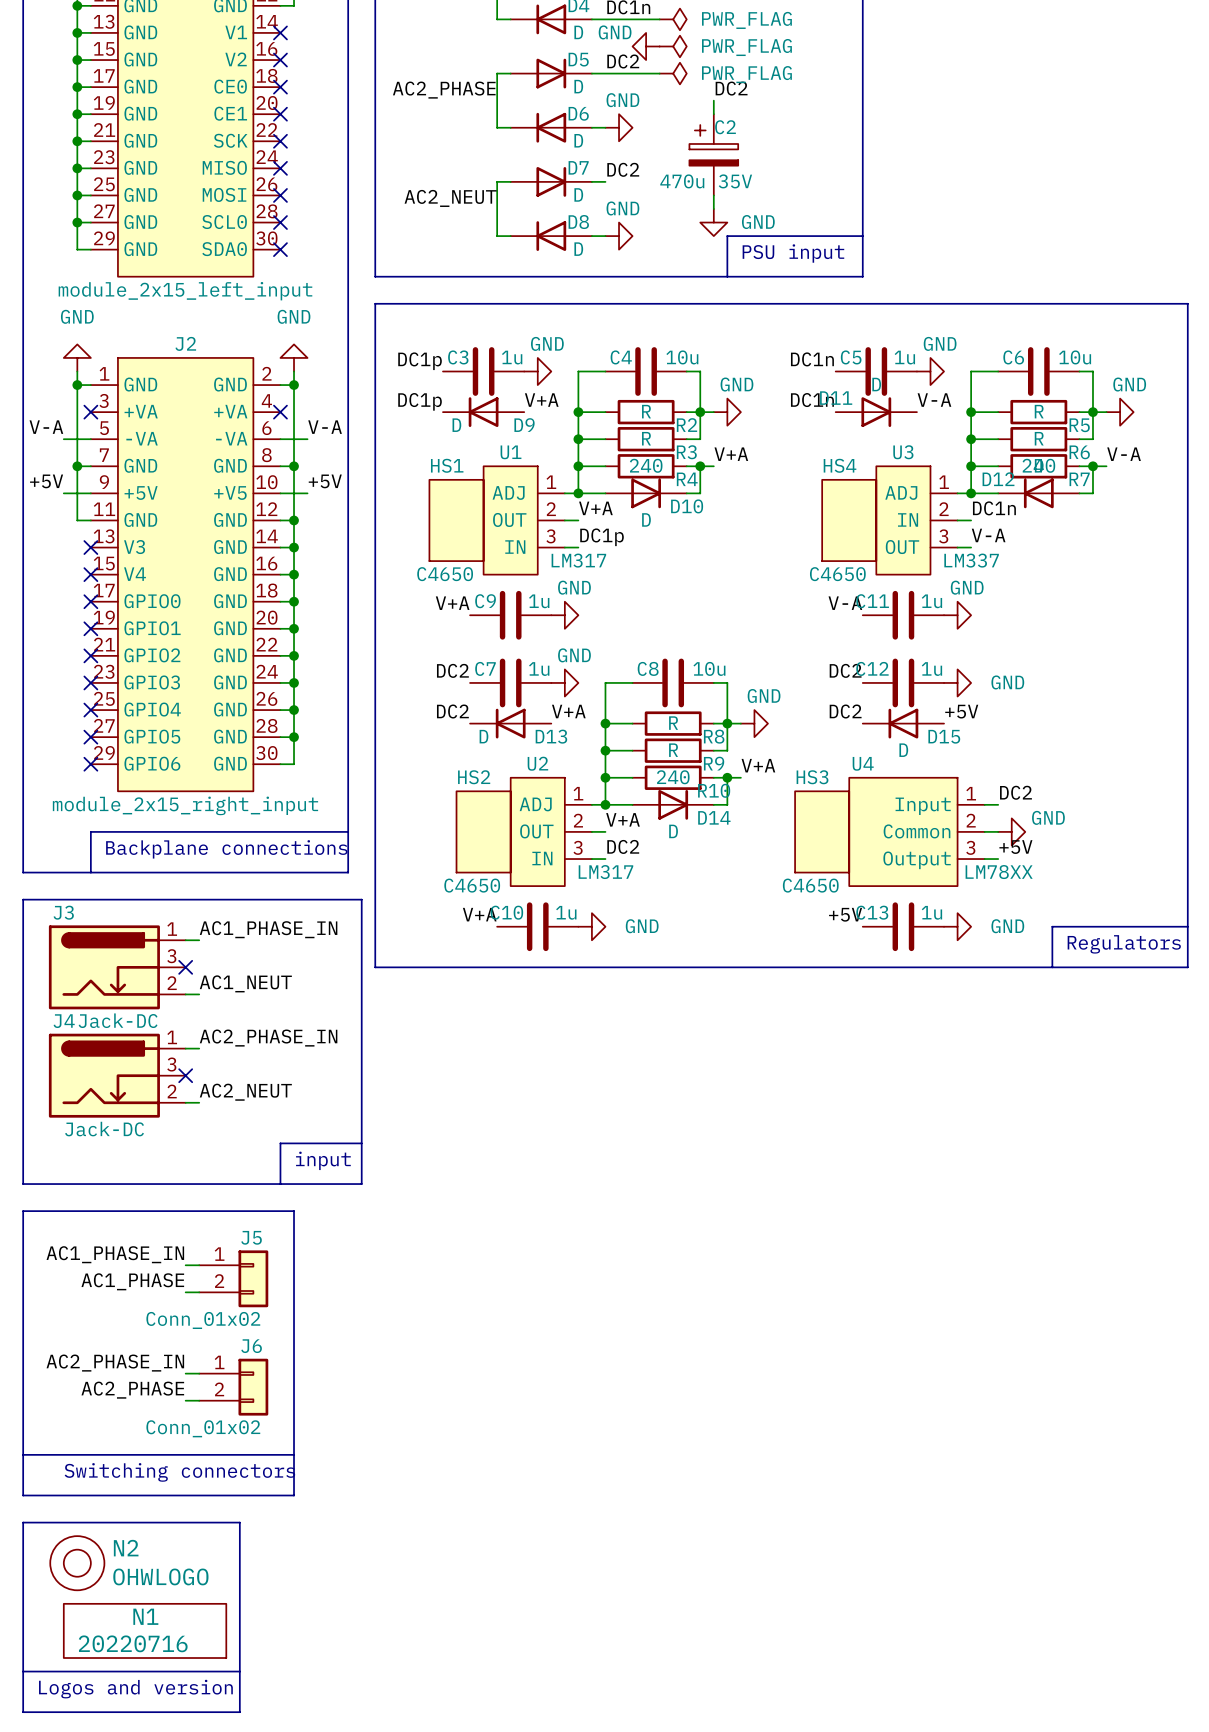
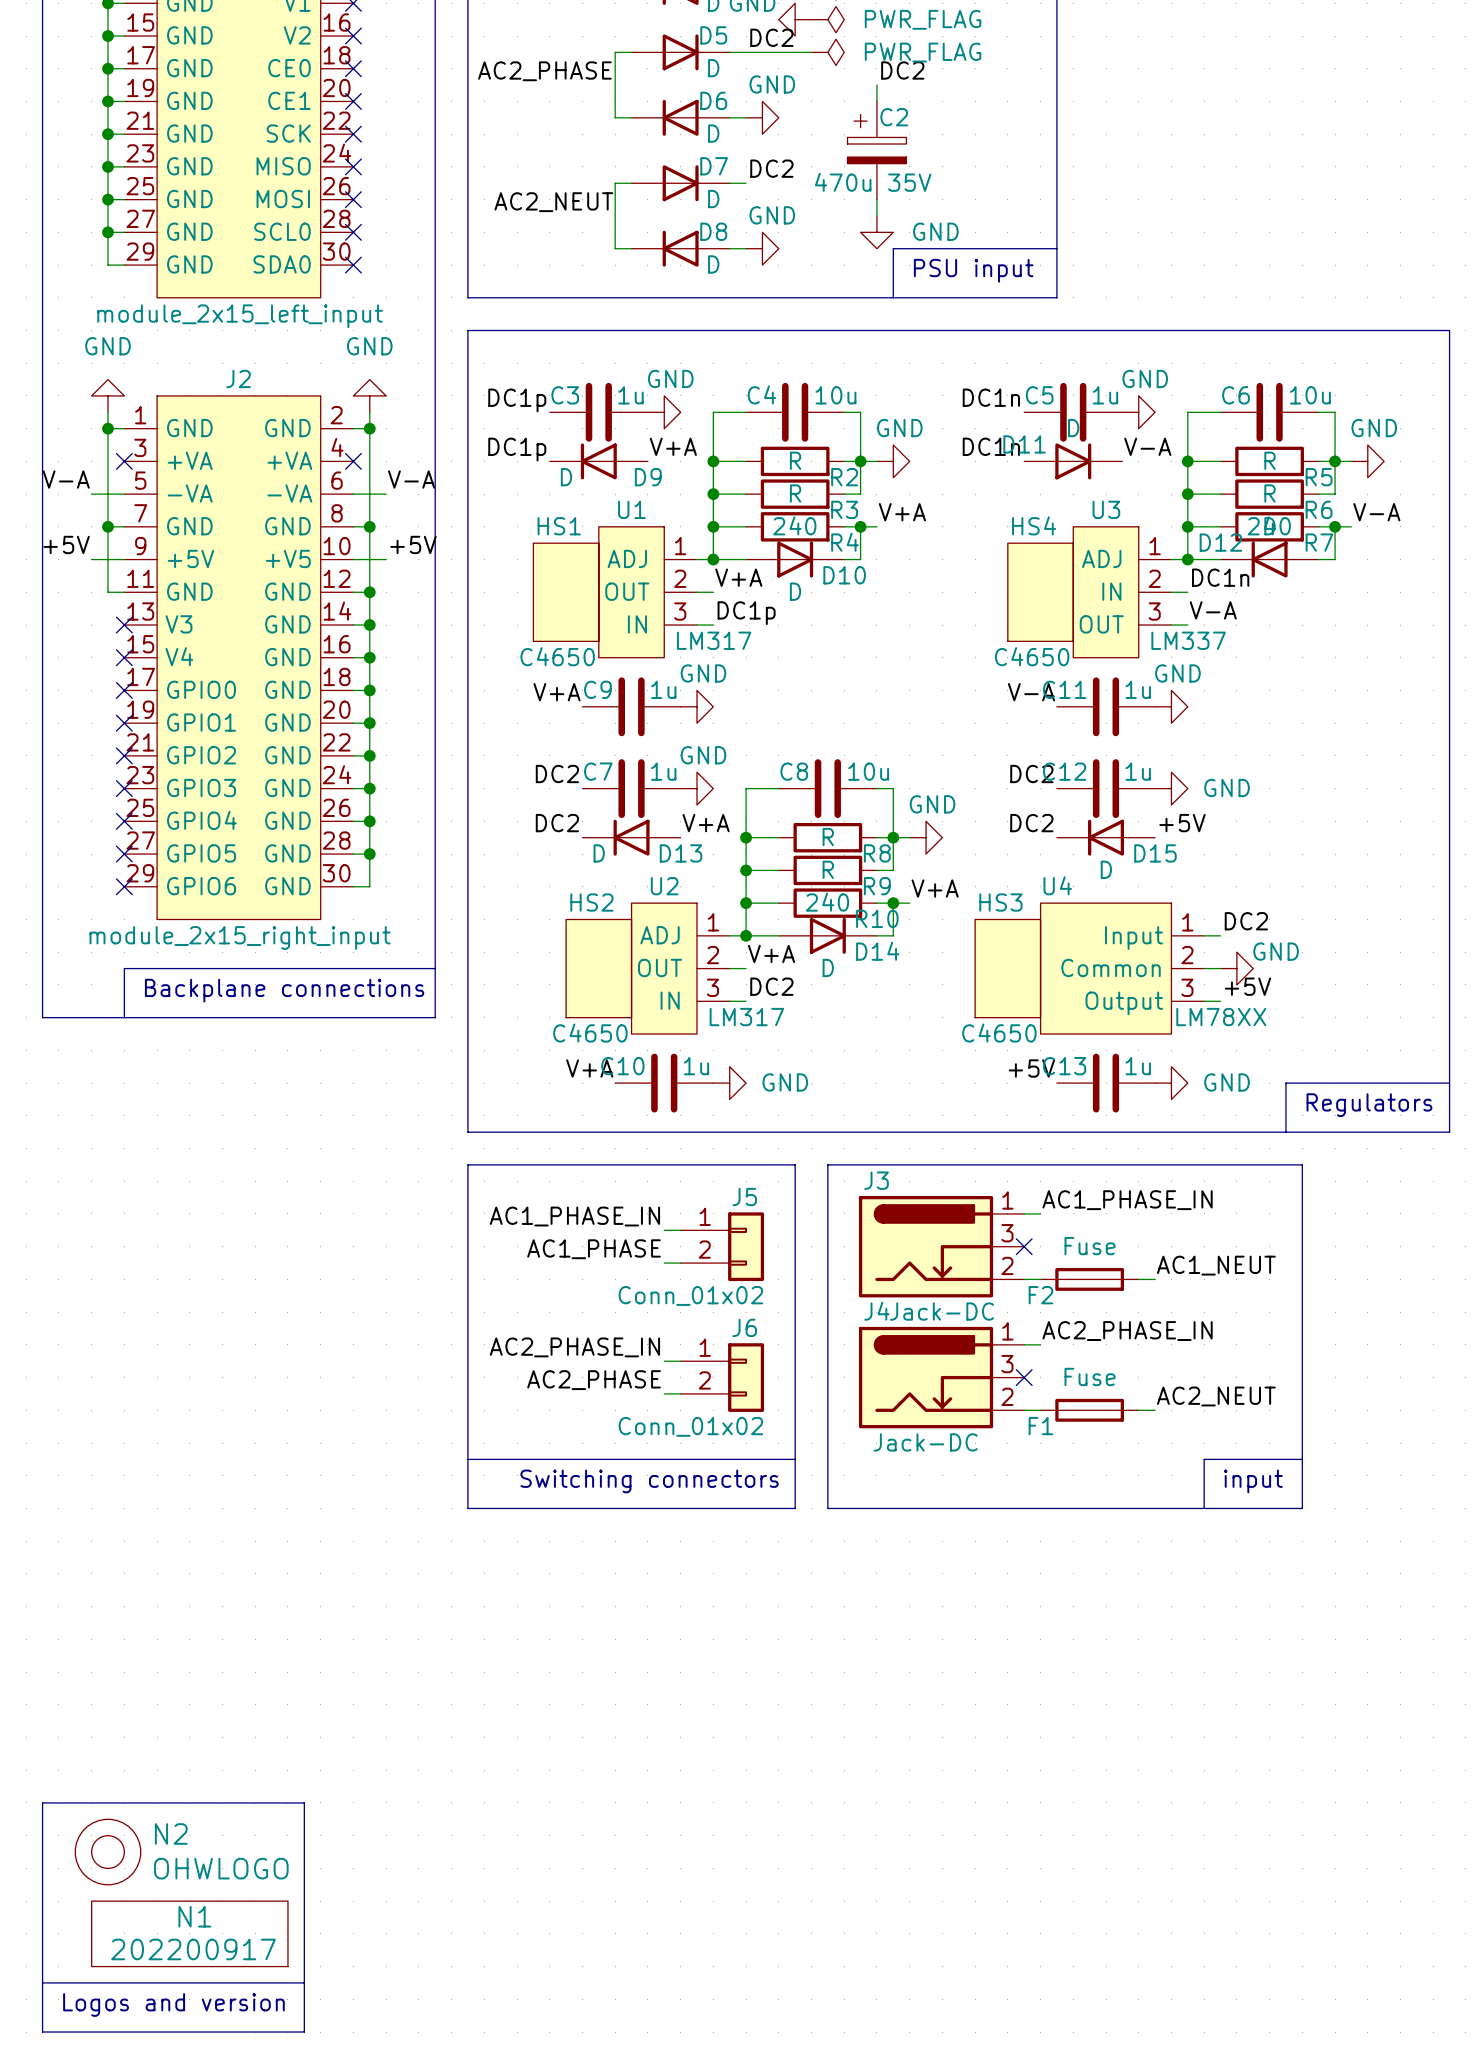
line: (23, 899) (23, 1184) (361, 1184) (361, 899) (23, 899) -> none
label: AC1_PHASE_IN (268, 929) -> none
wire: (185, 940) (199, 940) -> none
J3 position: (117, 967) -> (941, 1246)
no-connect mark: (185, 967) -> none
label: AC1_NEUT (245, 983) -> none
wire: (185, 994) (199, 994) -> none
line: none -> (467, 1164) (795, 1164) (795, 1508) (467, 1508) (467, 1164)
line: none -> (827, 1164) (827, 1508) (1302, 1508) (1302, 1164) (827, 1164)
label: none -> AC1_PHASE_IN (1127, 1200)
wire: none -> (1024, 1213) (1040, 1213)
label: AC2_PHASE_IN (268, 1038) -> none
label: none -> AC1_PHASE_IN (574, 1216)
wire: (185, 1048) (199, 1048) -> none
wire: none -> (664, 1230) (680, 1230)
no-connect mark: none -> (1024, 1246)
label: none -> AC1_PHASE (594, 1249)
J4 position: (117, 1075) -> (941, 1377)
no-connect mark: (185, 1075) -> none
wire: none -> (664, 1263) (680, 1263)
label: none -> AC1_NEUT (1216, 1265)
wire: none -> (1024, 1279) (1040, 1279)
F2: none -> Fuse (1089, 1279)
wire: none -> (1138, 1279) (1155, 1279)
label: AC2_NEUT (245, 1092) -> none
wire: (185, 1102) (199, 1102) -> none
label: none -> AC2_PHASE_IN (1127, 1331)
line: (361, 1143) (280, 1143) (280, 1184) -> none
wire: none -> (1024, 1344) (1040, 1344)
label: none -> AC2_PHASE_IN (574, 1347)
wire: none -> (664, 1361) (680, 1361)
text: input (323, 1160) -> none
no-connect mark: none -> (1024, 1377)
label: none -> AC2_PHASE (594, 1380)
wire: none -> (664, 1393) (680, 1393)
label: none -> AC2_NEUT (1216, 1396)
wire: none -> (1024, 1410) (1040, 1410)
F1: none -> Fuse (1089, 1410)
wire: none -> (1138, 1410) (1155, 1410)
line: (23, 1211) (23, 1495) (294, 1495) (294, 1211) (23, 1211) -> none
line: none -> (467, 1459) (795, 1459)
line: none -> (1302, 1459) (1204, 1459) (1204, 1508)
label: AC1_PHASE_IN (115, 1254) -> none
text: none -> Switching connectors (649, 1481)
text: none -> input (1253, 1481)
wire: (185, 1265) (199, 1265) -> none
J5 position: (233, 1278) -> (722, 1246)
label: AC1_PHASE (132, 1281) -> none
wire: (185, 1292) (199, 1292) -> none
label: AC2_PHASE_IN (115, 1363) -> none
wire: (185, 1373) (199, 1373) -> none
J6 position: (233, 1387) -> (722, 1377)
label: AC2_PHASE (132, 1390) -> none
wire: (185, 1400) (199, 1400) -> none
line: (23, 1454) (294, 1454) -> none
text: Switching connectors (179, 1472) -> none
N1 value: 20220716 (133, 1643) -> 202200917 (193, 1949)

